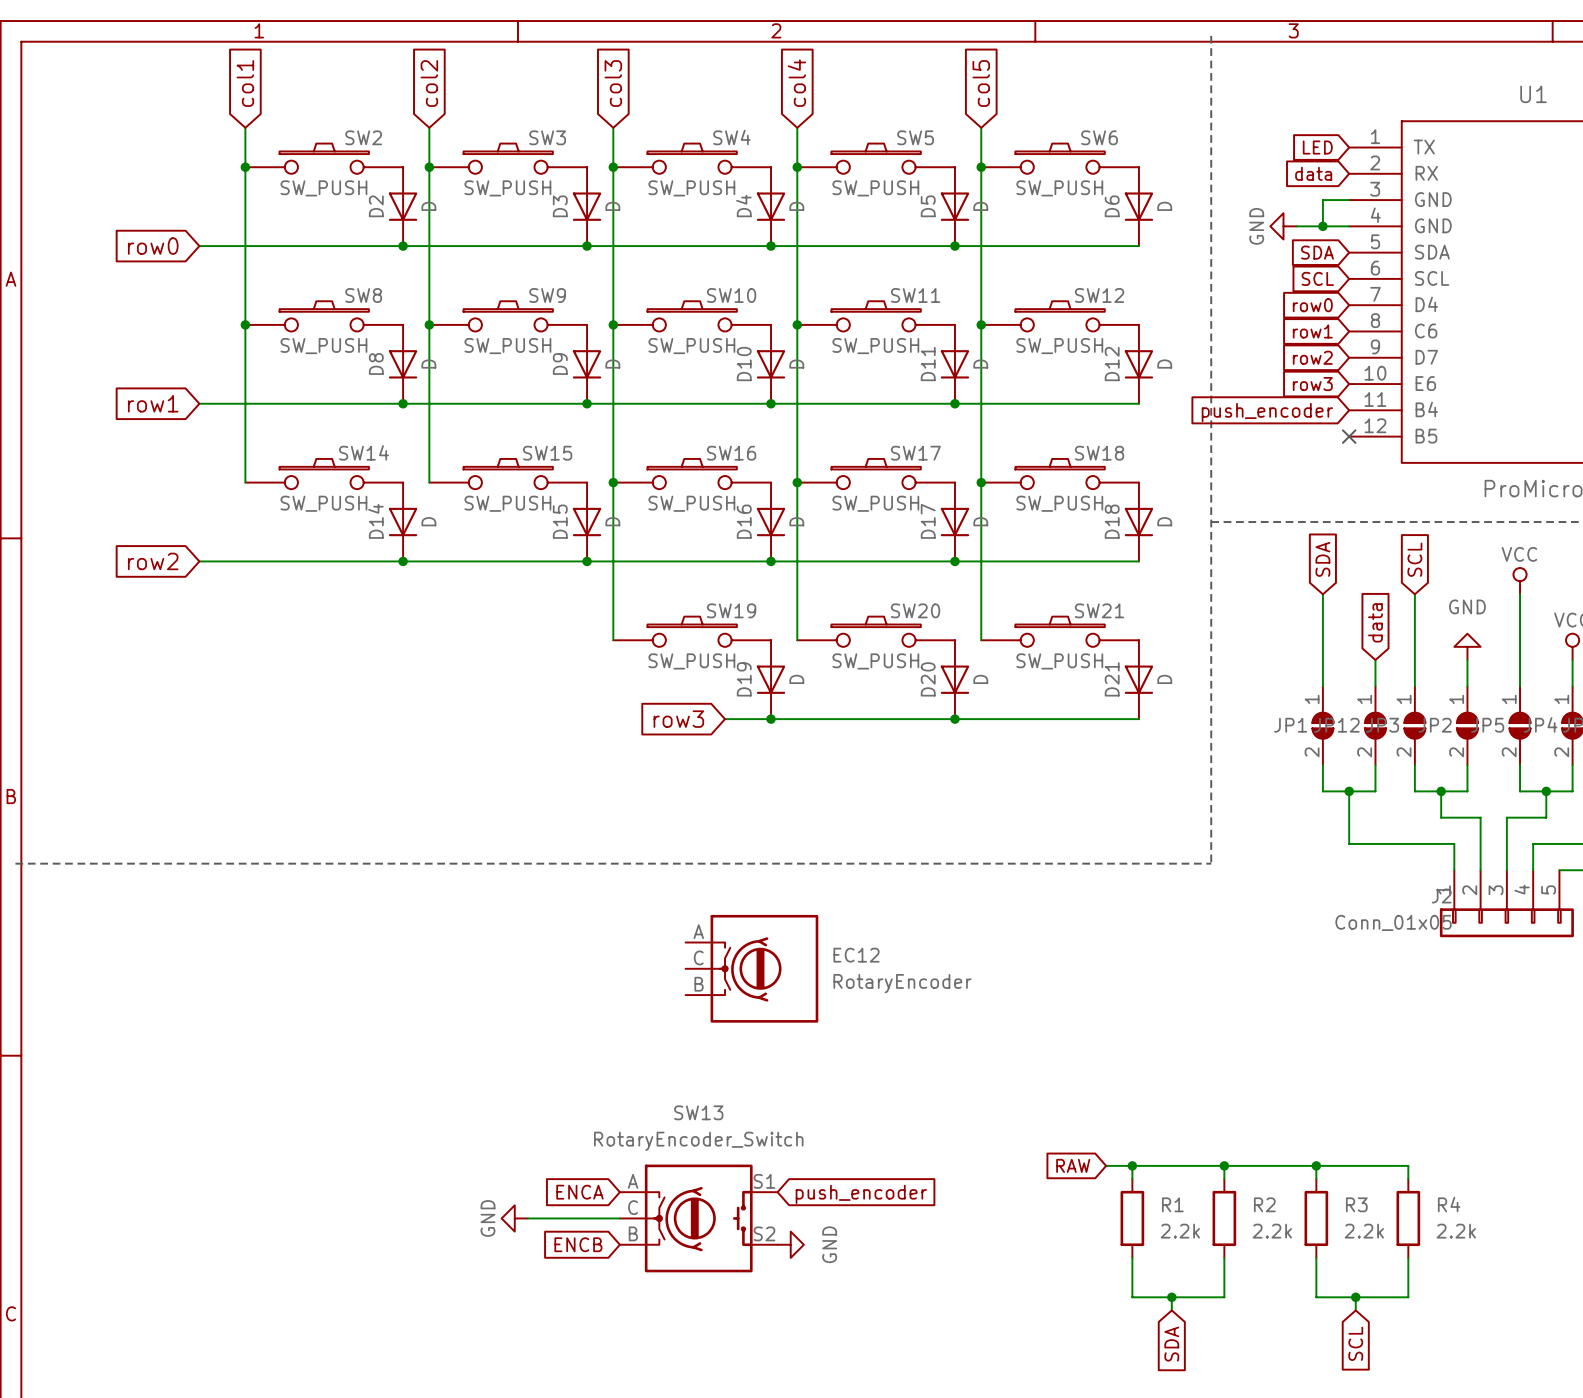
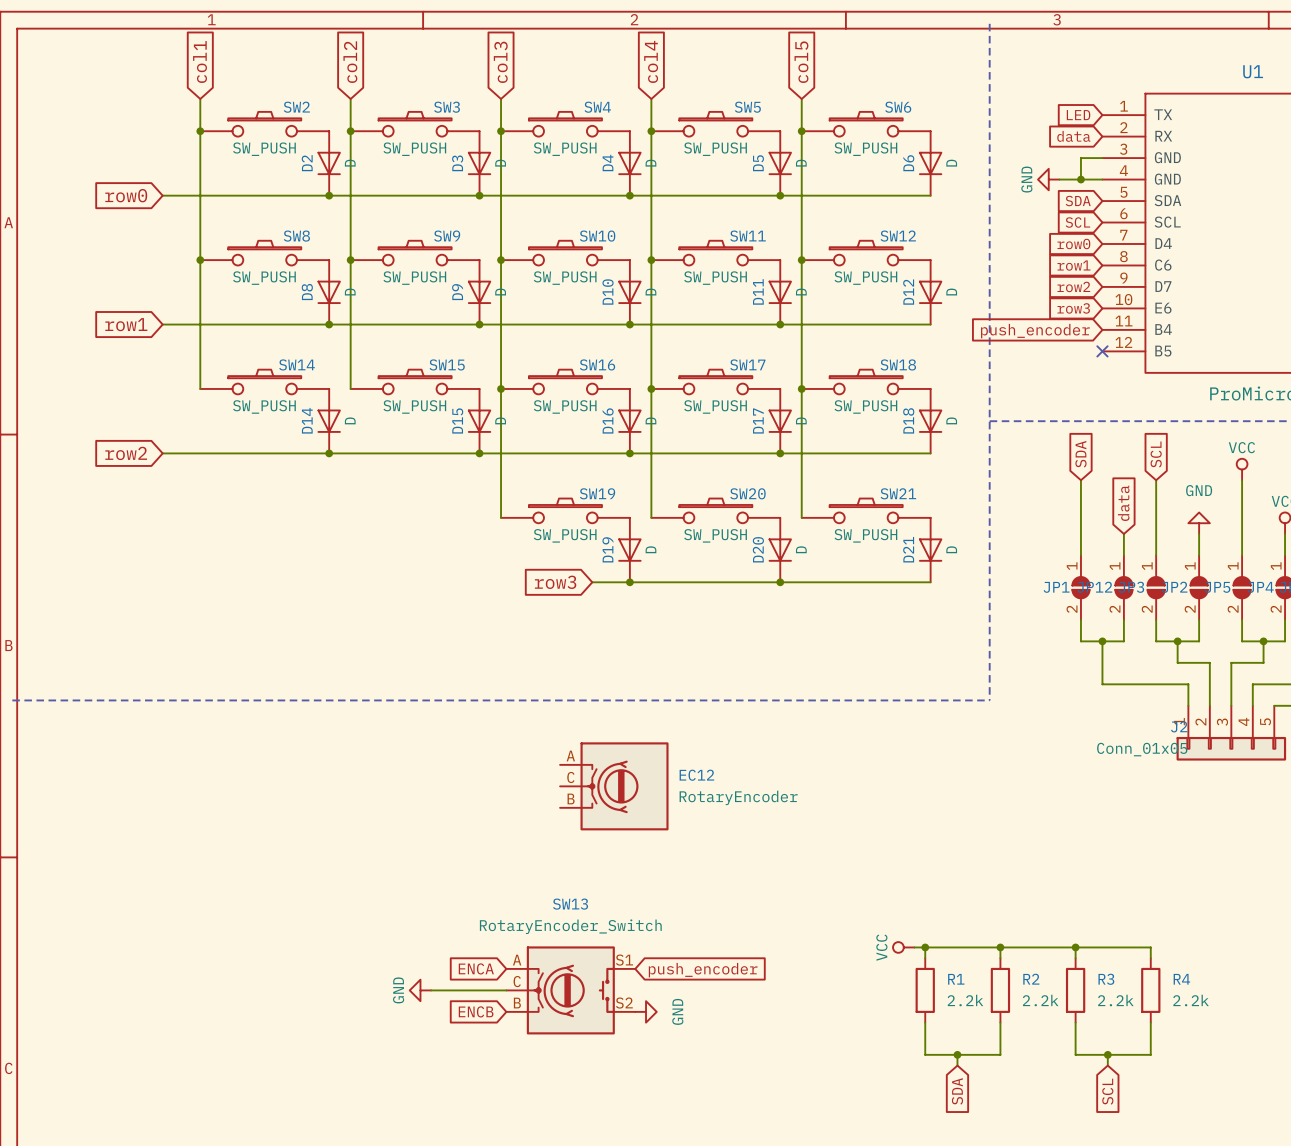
global label: RAW (1073, 1165) -> none
power symbol: none -> VCC (903, 947)

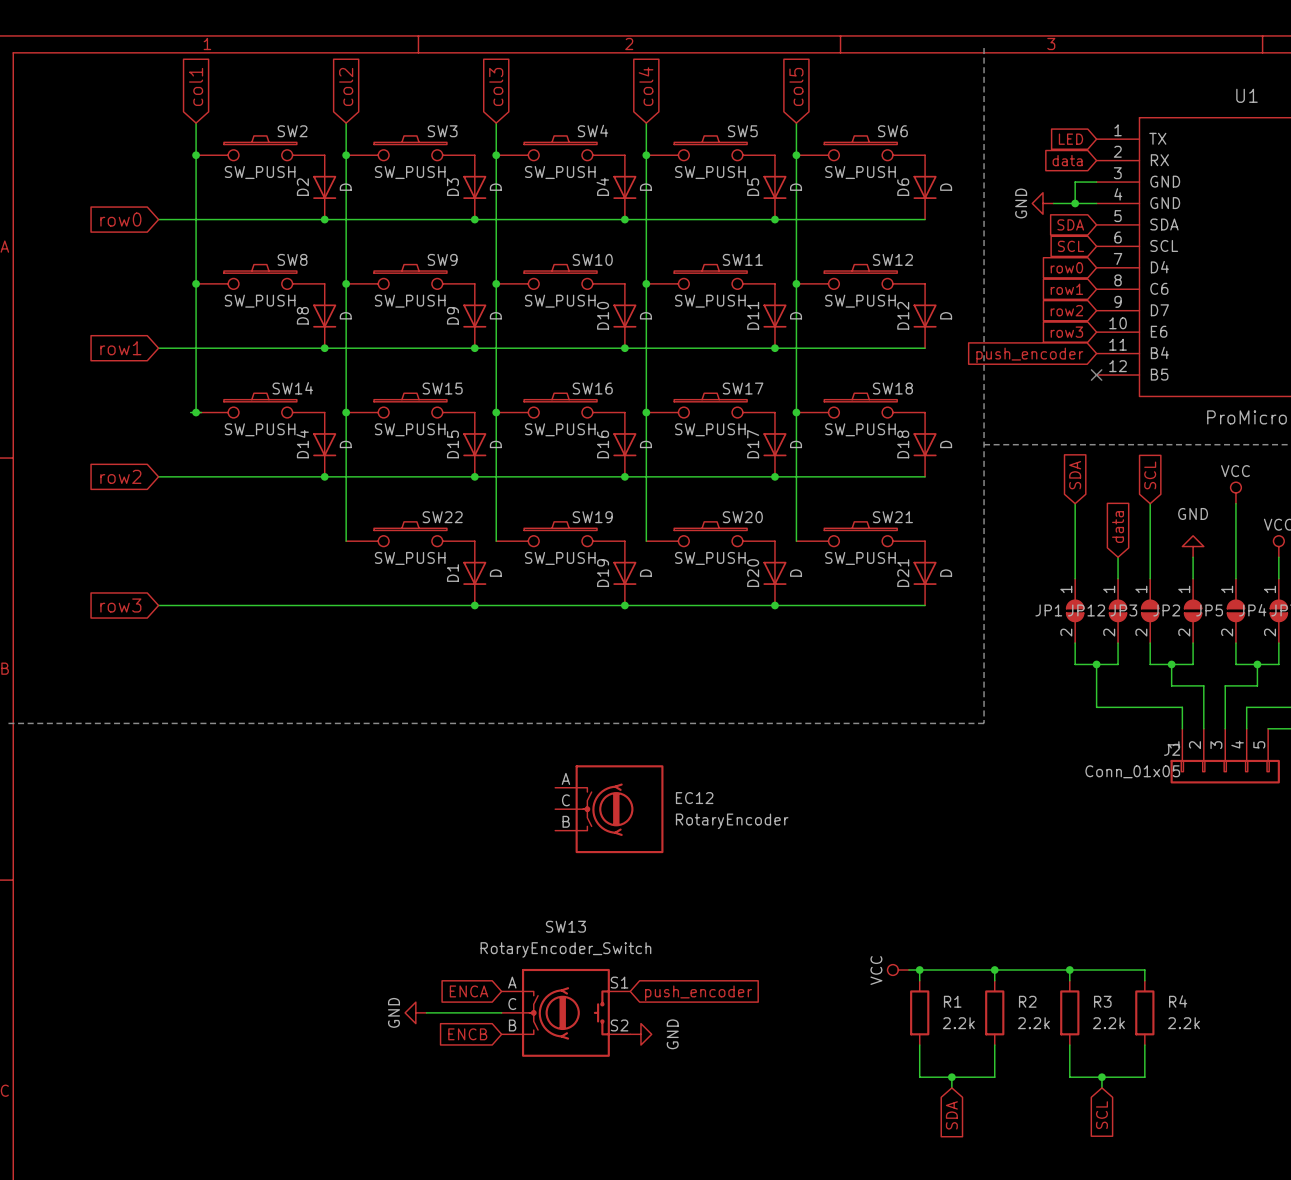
junction: none -> (196, 412)
wire: none -> (346, 412) (346, 541)
junction: none -> (346, 412)
SW22: none -> SW_PUSH (410, 534)
D1: none -> D (474, 573)
global label: none -> row3 (120, 605)
wire: none -> (158, 605) (587, 605)
junction: none -> (474, 605)
global label: row3 (555, 582) -> none

